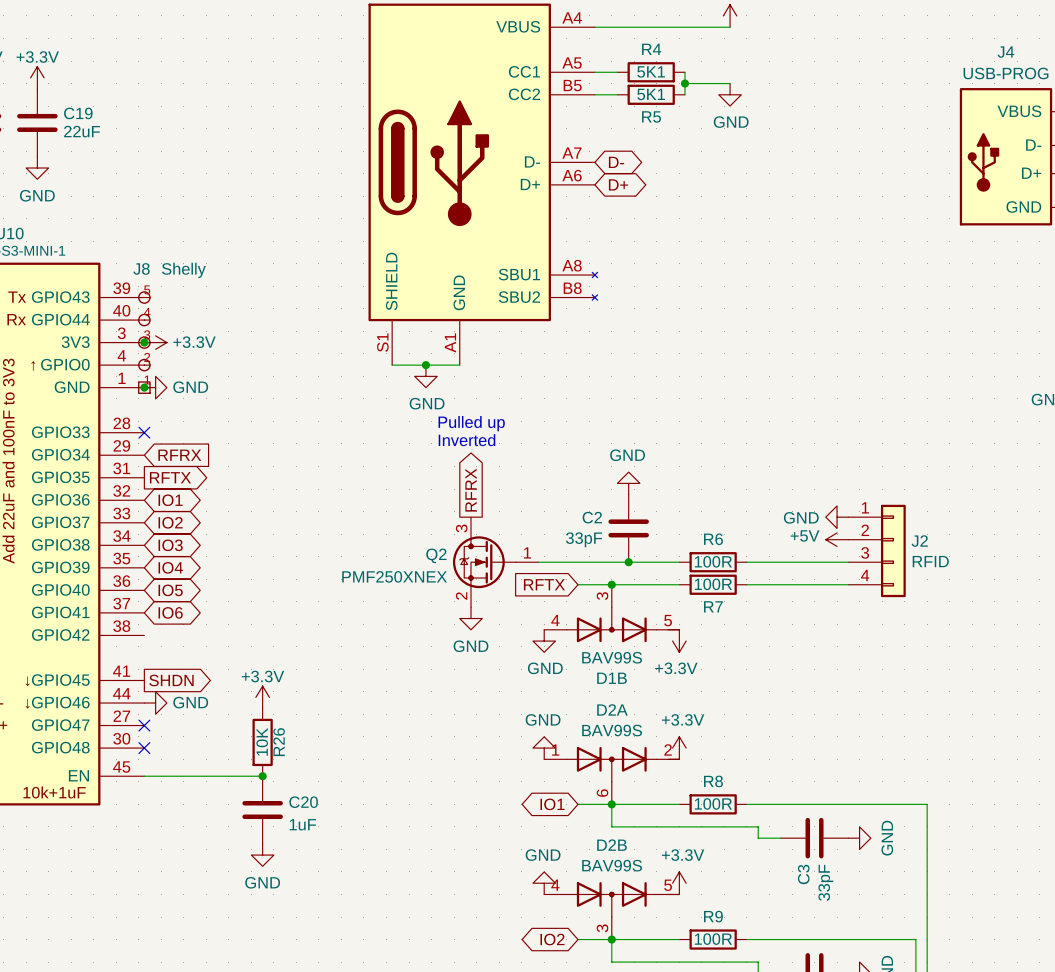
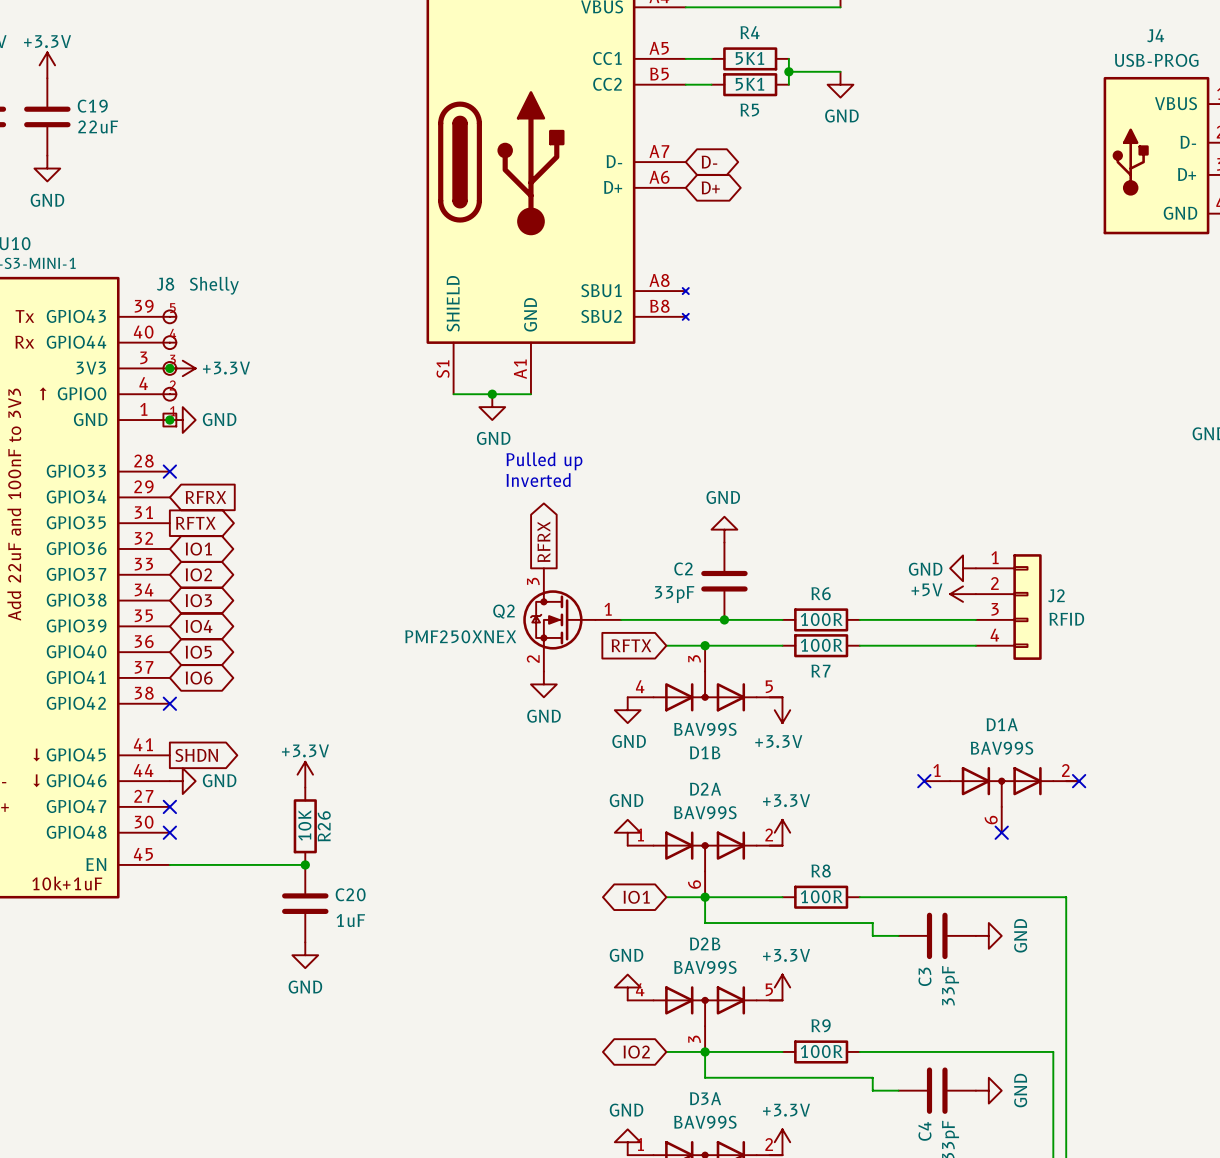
no-connect mark: none -> (169, 703)
no-connect mark: none -> (924, 781)
no-connect mark: none -> (1079, 781)
D1A: none -> BAV99S (1001, 799)
no-connect mark: none -> (1001, 832)

